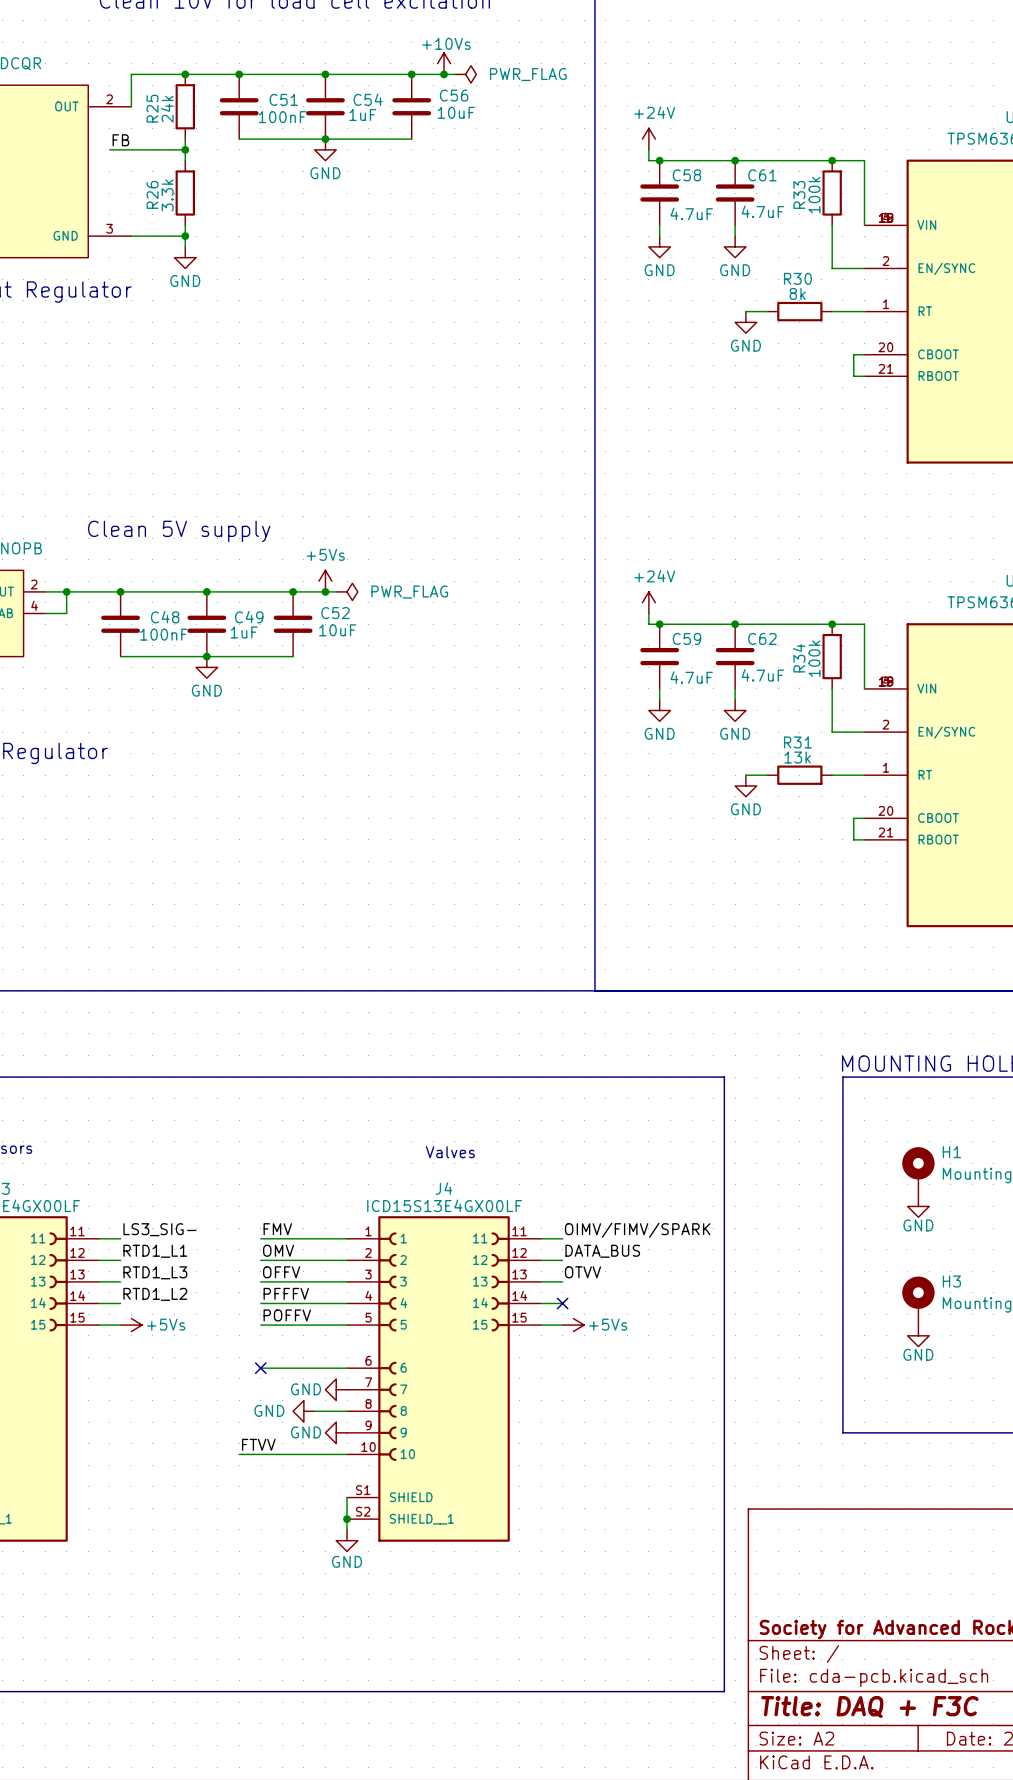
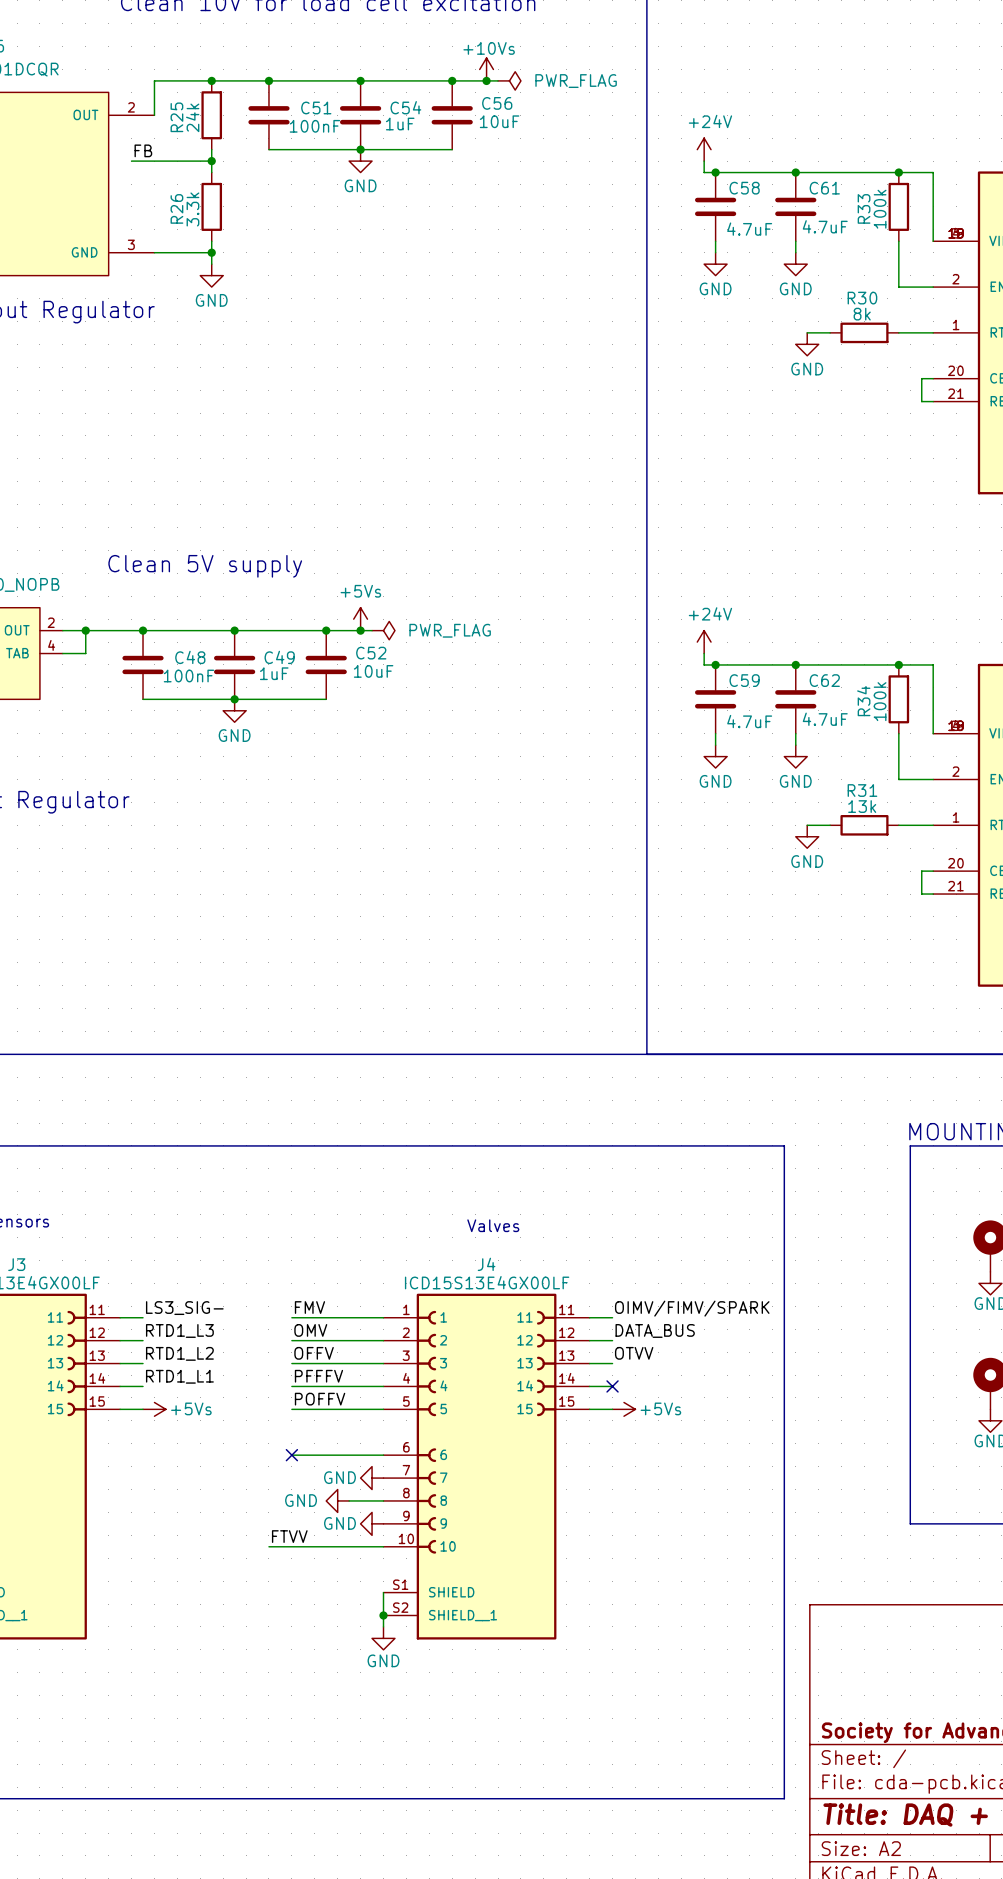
label: RTD1_L1 (155, 1251) -> RTD1_L3 (179, 1330)
label: RTD1_L3 (155, 1272) -> RTD1_L2 (179, 1353)
label: RTD1_L2 (155, 1294) -> RTD1_L1 (179, 1376)

